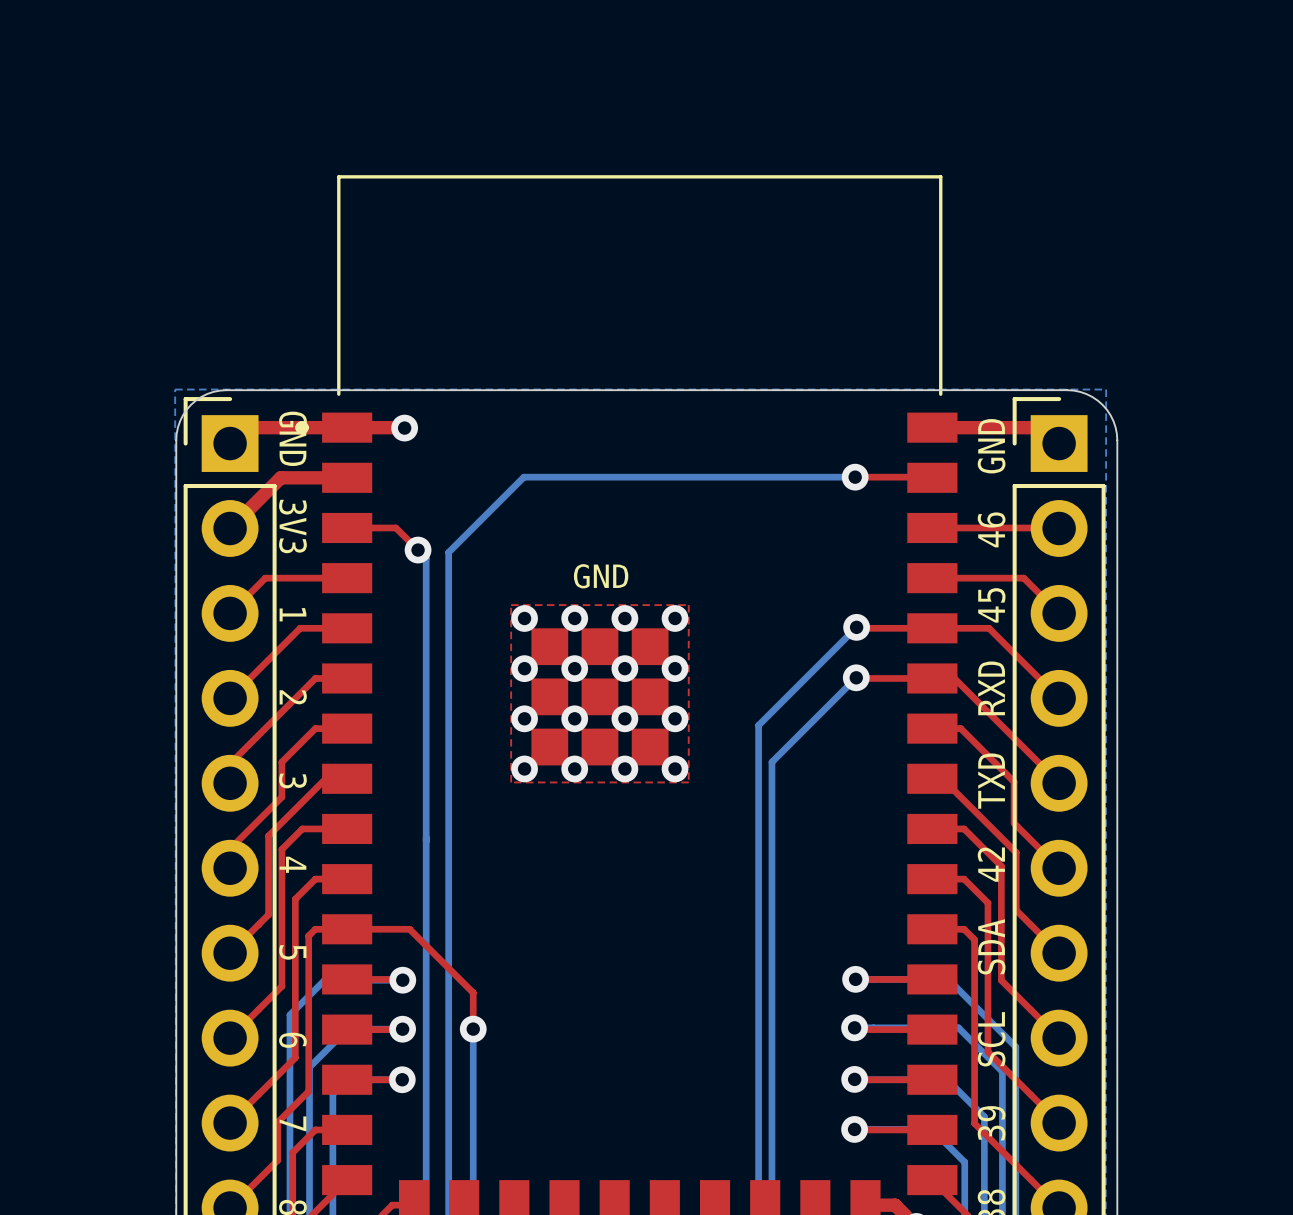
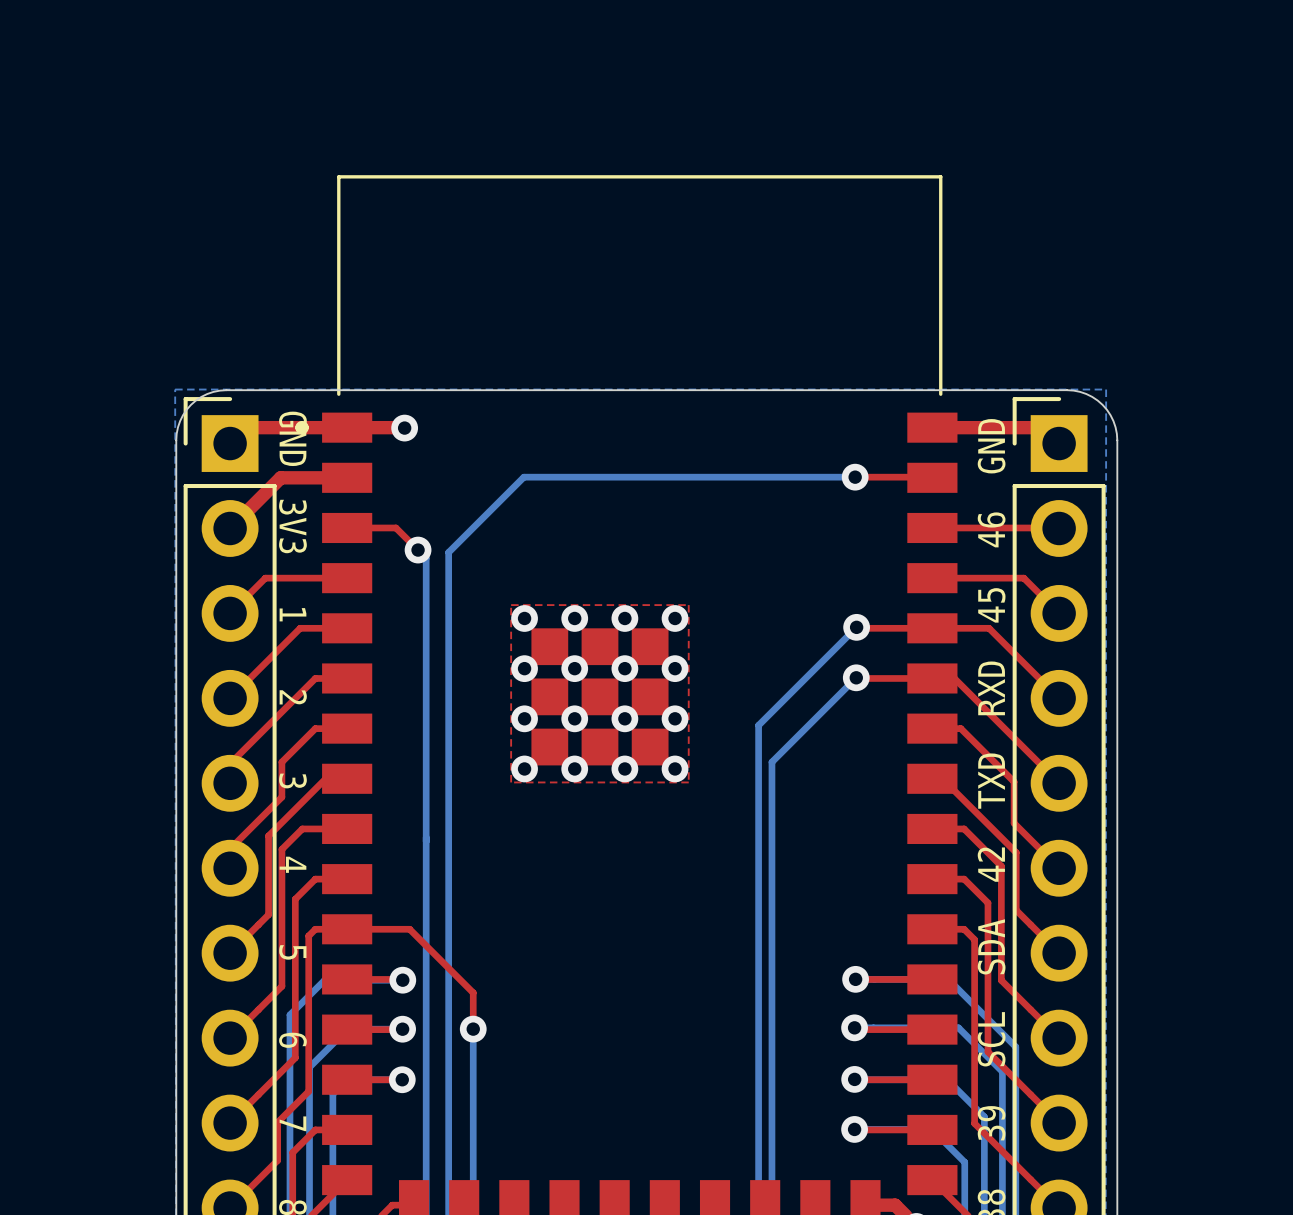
text: GND (601, 576) -> none

